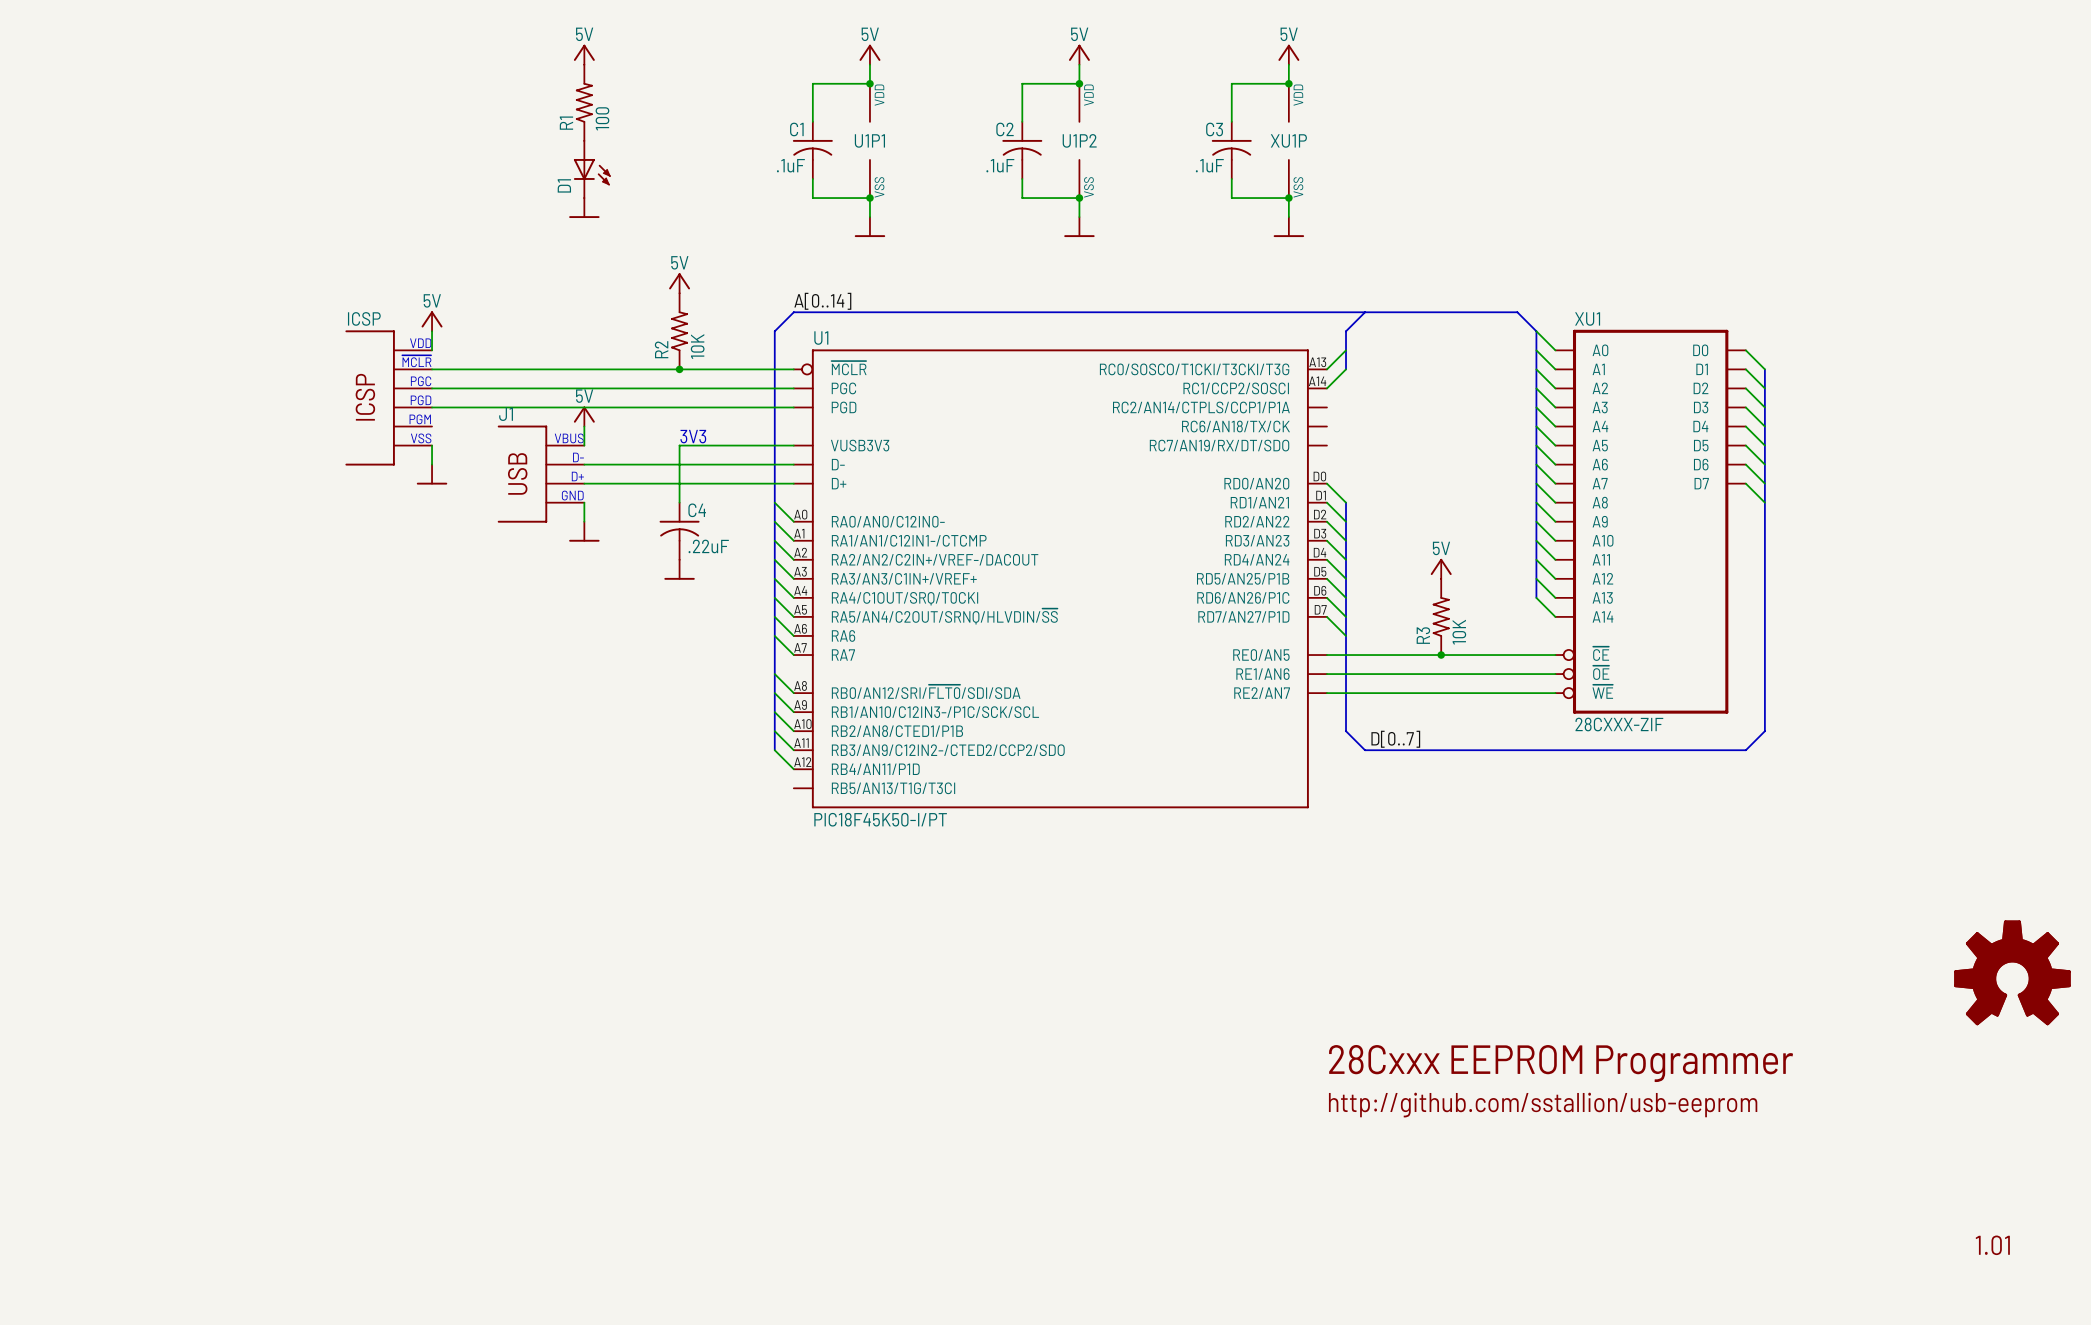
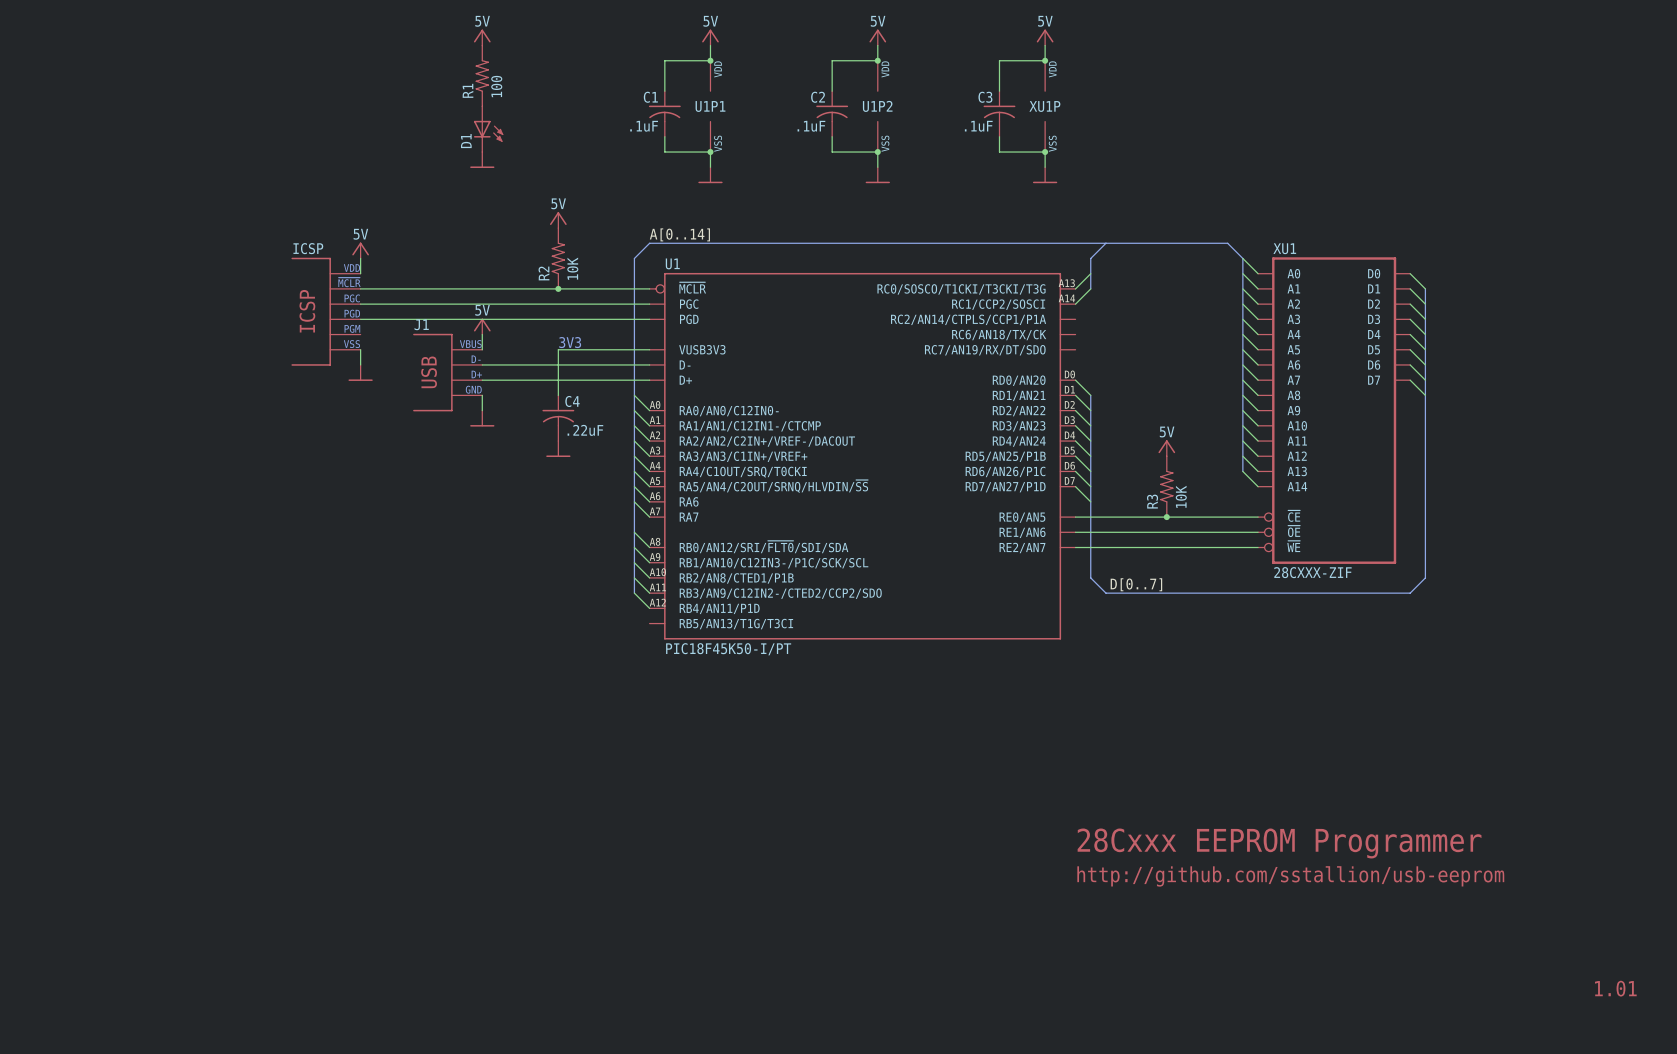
part: (2012, 972) -> none

